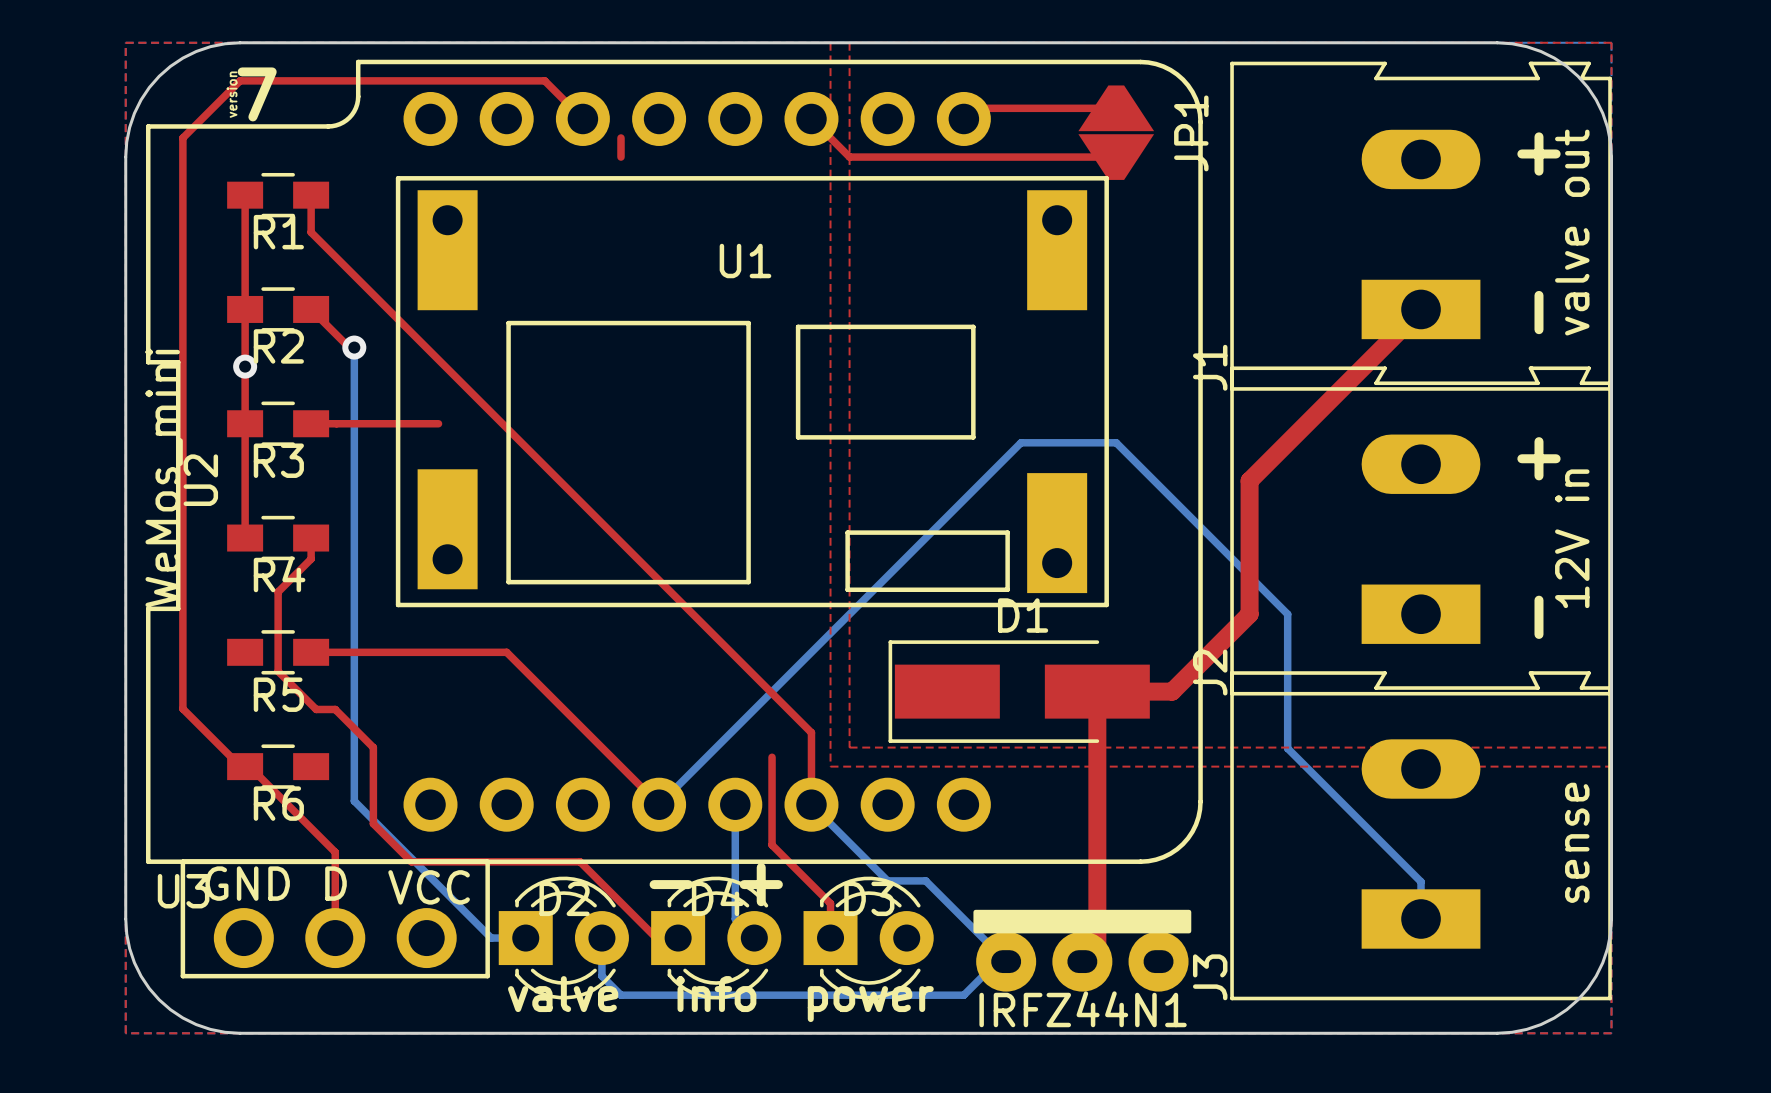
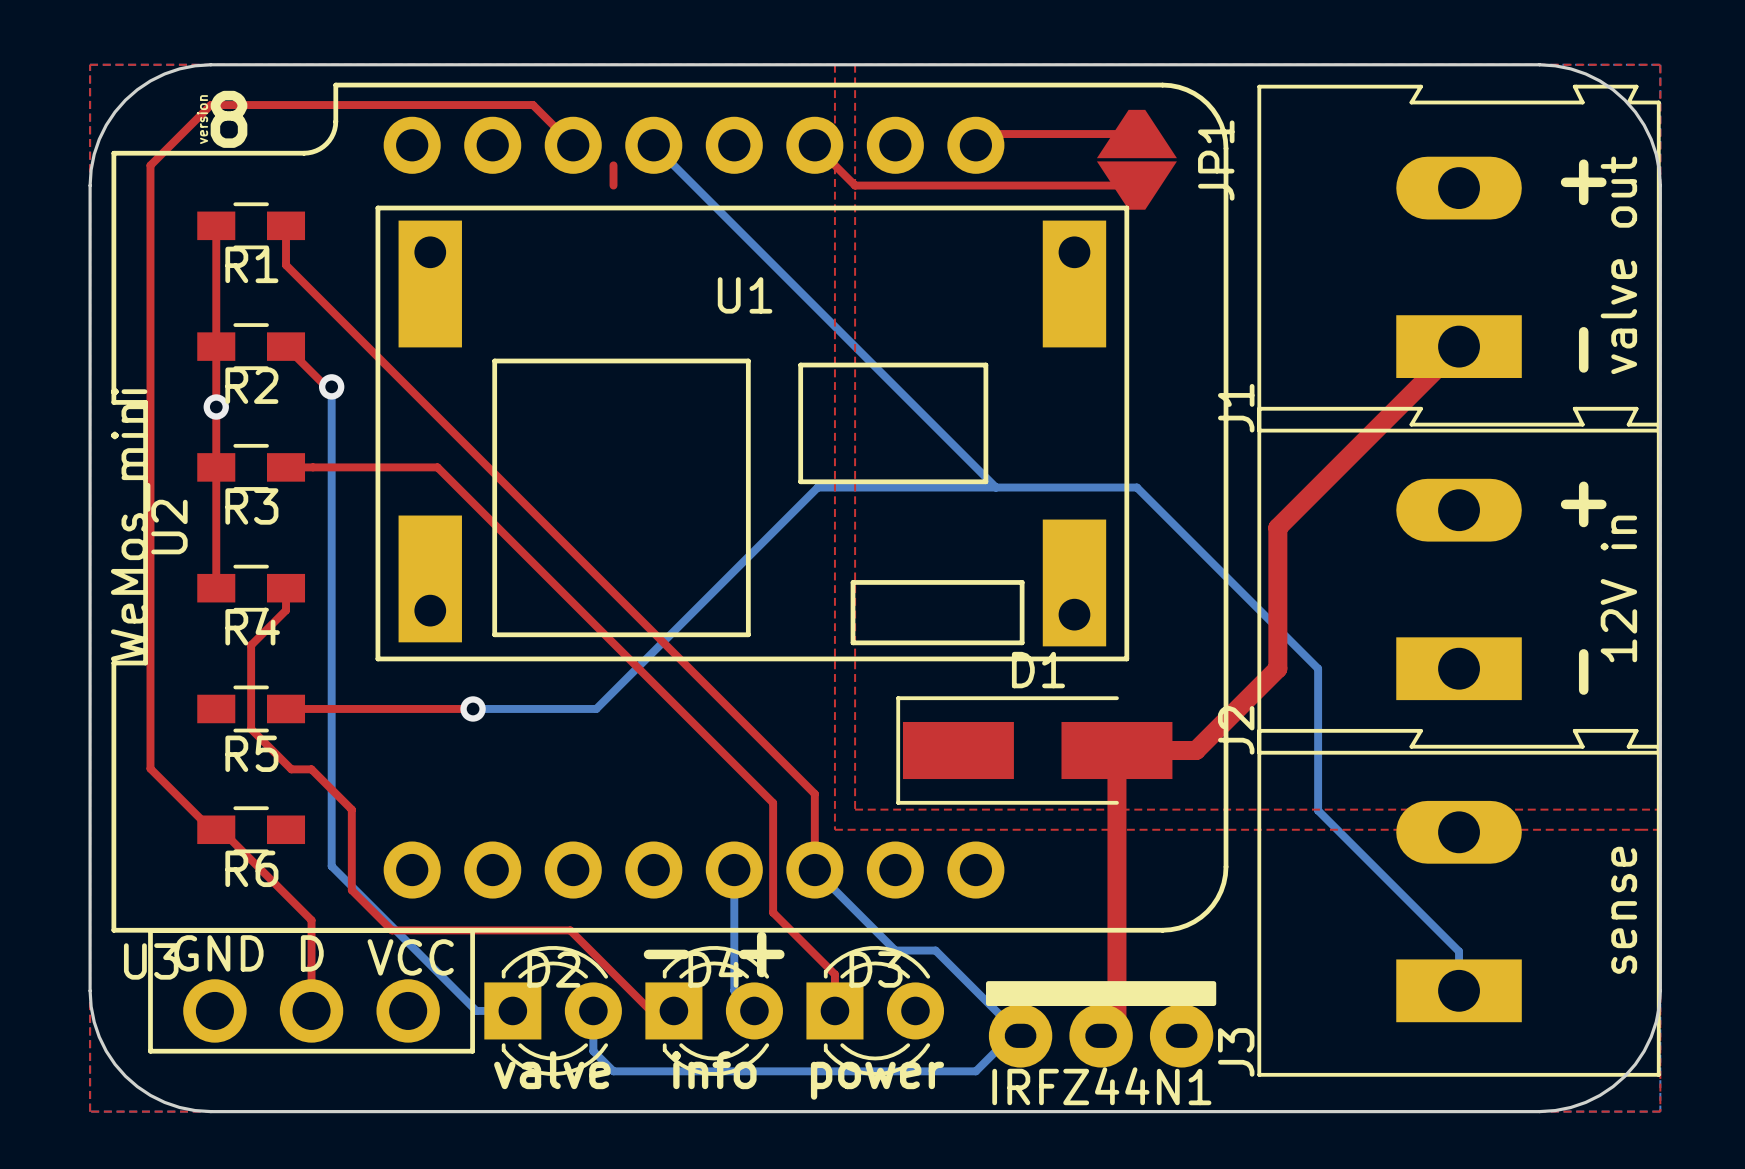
text: 7 (257, 94) -> 8 (229, 119)
bottom track: none -> (653, 145) (996, 487)
top track: none -> (420, 467) (437, 467) (773, 802) (773, 819)
bottom track: (1021, 442) (659, 804) -> (1036, 487) (817, 487) (596, 708) (473, 708)
top track: (488, 652) (506, 652) (659, 804) -> none
via: none -> (473, 708)

